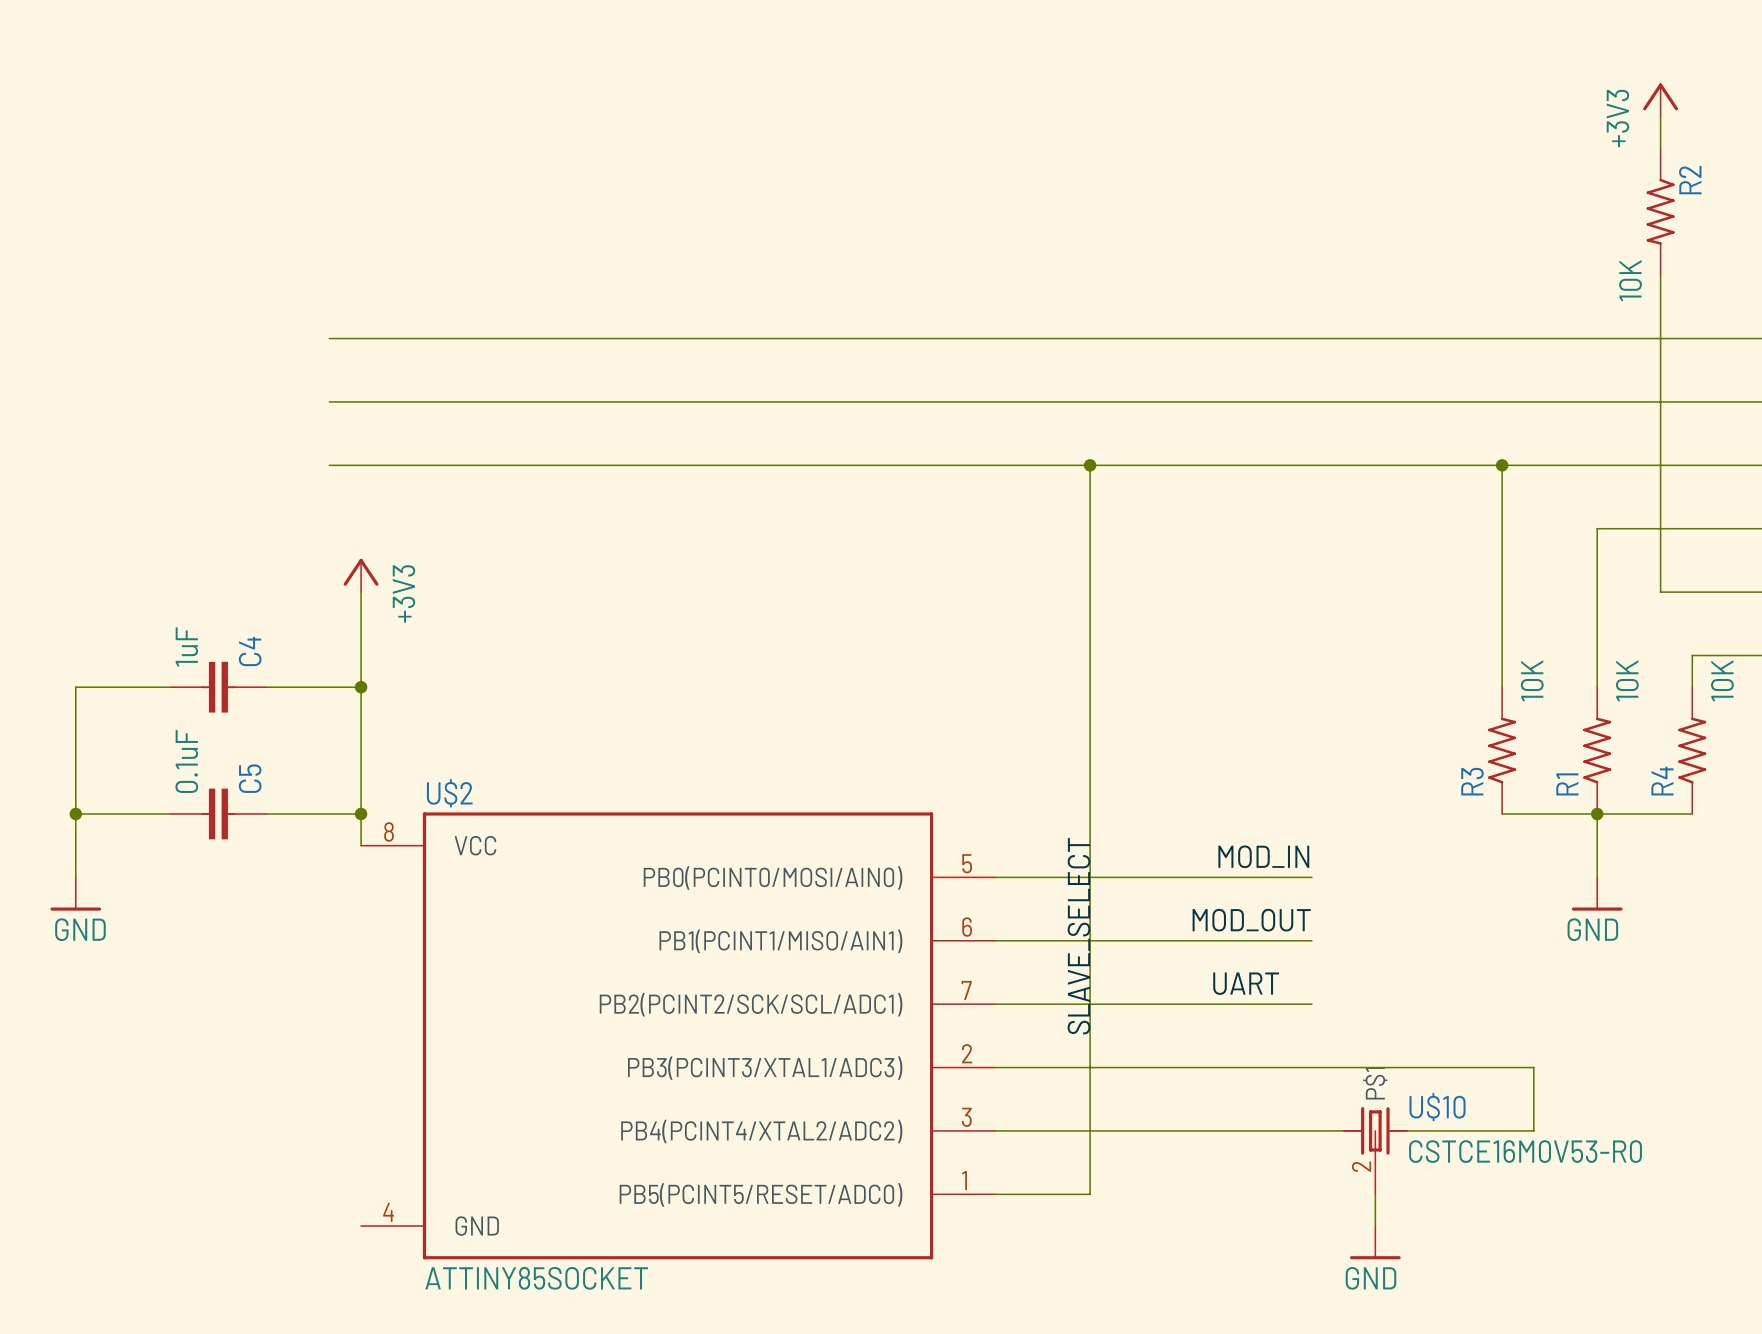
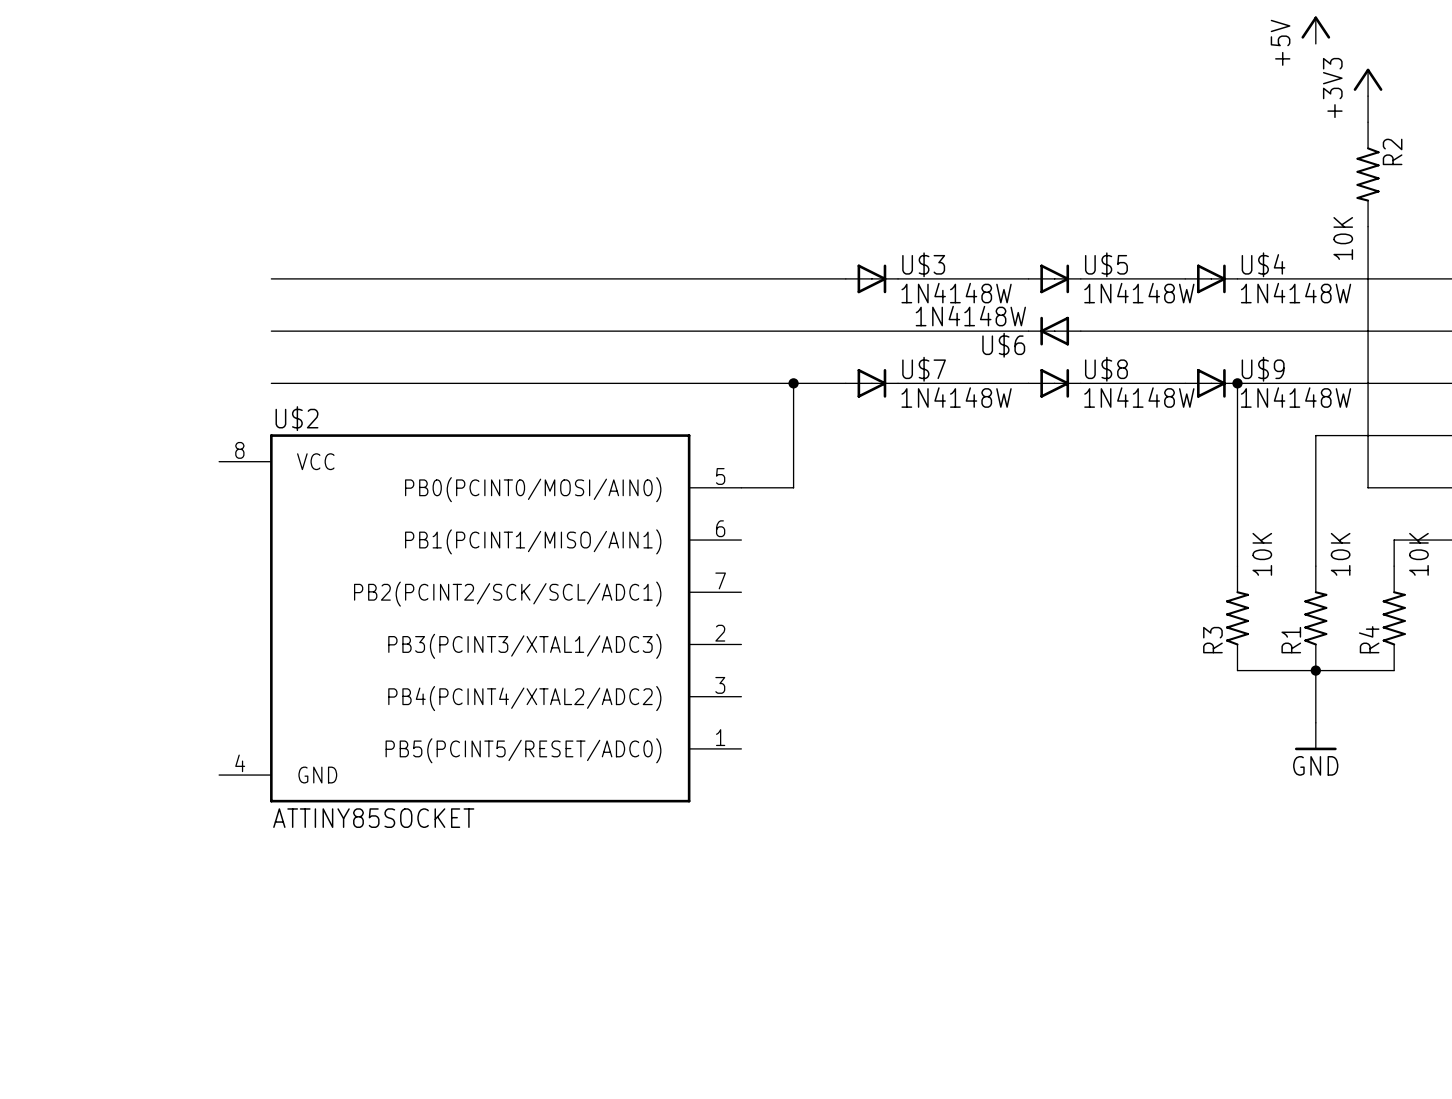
power symbol: none -> +5V (1315, 30)
U$3: none -> 1N4148W (871, 278)
U$5: none -> 1N4148W (1054, 278)
U$4: none -> 1N4148W (1211, 278)
U$6: none -> 1N4148W (1054, 331)
wire: none -> (793, 383) (793, 487) (741, 487)
junction: none -> (793, 383)
wire: (1026, 465) (1090, 465) (1090, 1194) (994, 1194) -> none
U$7: none -> 1N4148W (871, 383)
junction: (1090, 465) -> none
U$8: none -> 1N4148W (1054, 383)
U$9: none -> 1N4148W (1211, 383)
power symbol: +3V3 (361, 575) -> none
wire: (361, 592) (361, 845) -> none
wire: (170, 687) (75, 687) (75, 877) -> none
C4: 1uF (218, 687) -> none
wire: (265, 687) (361, 687) -> none
junction: (361, 687) -> none
wire: (75, 813) (170, 813) -> none
junction: (75, 813) -> none
C5: 0.1uF (218, 813) -> none
wire: (265, 813) (361, 813) -> none
junction: (361, 813) -> none
label: MOD_IN (1263, 856) -> none
wire: (994, 877) (1311, 877) -> none
power symbol: GND (75, 894) -> none
label: MOD_OUT (1251, 920) -> none
label: SLAVE_SELECT (1079, 936) -> none
wire: (994, 940) (1311, 940) -> none
label: UART (1246, 983) -> none
wire: (994, 1004) (1311, 1004) -> none
U$2 position: (678, 1035) -> (480, 618)
wire: (994, 1067) (1533, 1067) (1533, 1130) (1407, 1130) -> none
wire: (994, 1130) (1343, 1130) -> none
U$10: CSTCE16M0V53-R0 (1375, 1150) -> none
wire: (1375, 1194) (1375, 1226) -> none
power symbol: GND (1375, 1242) -> none

